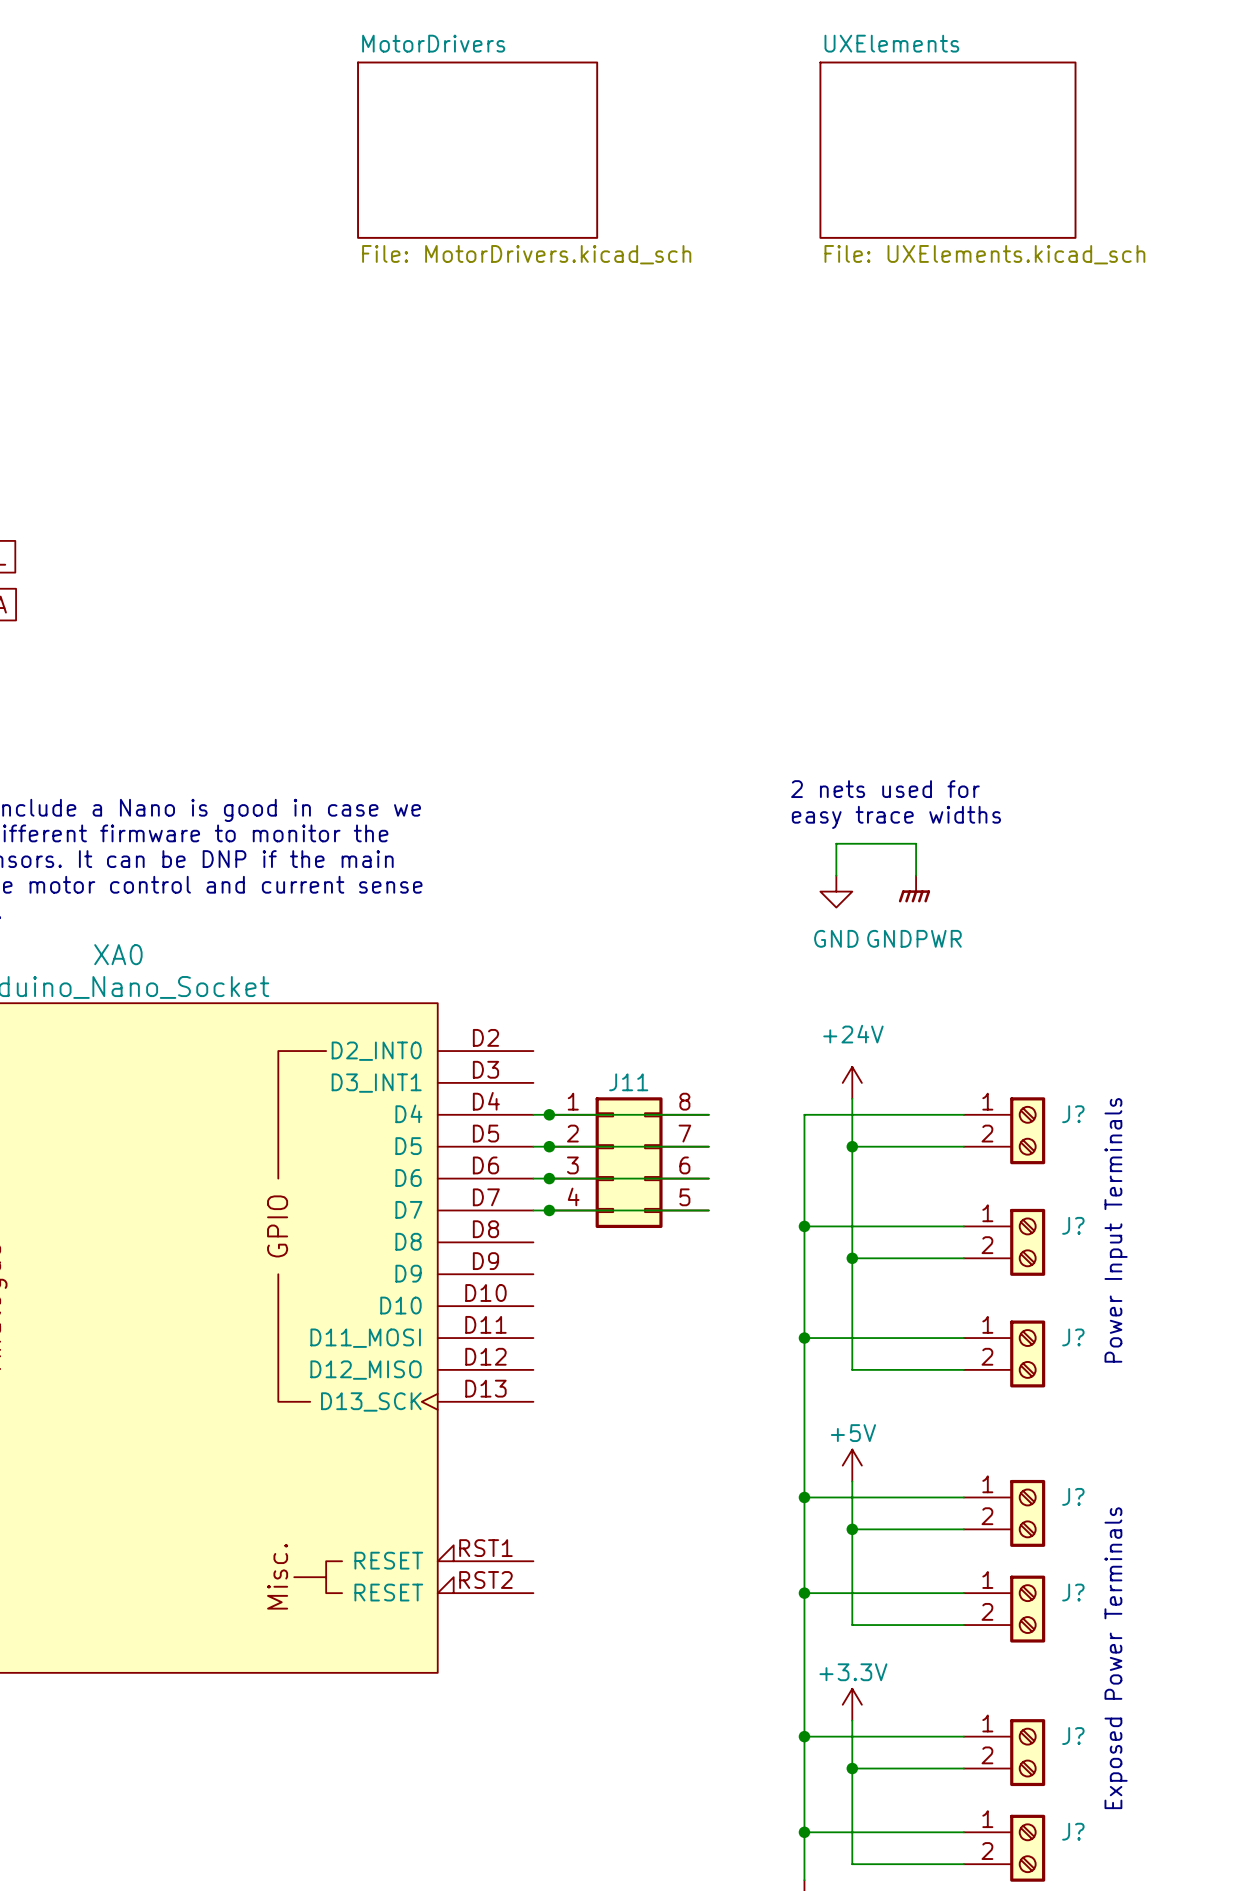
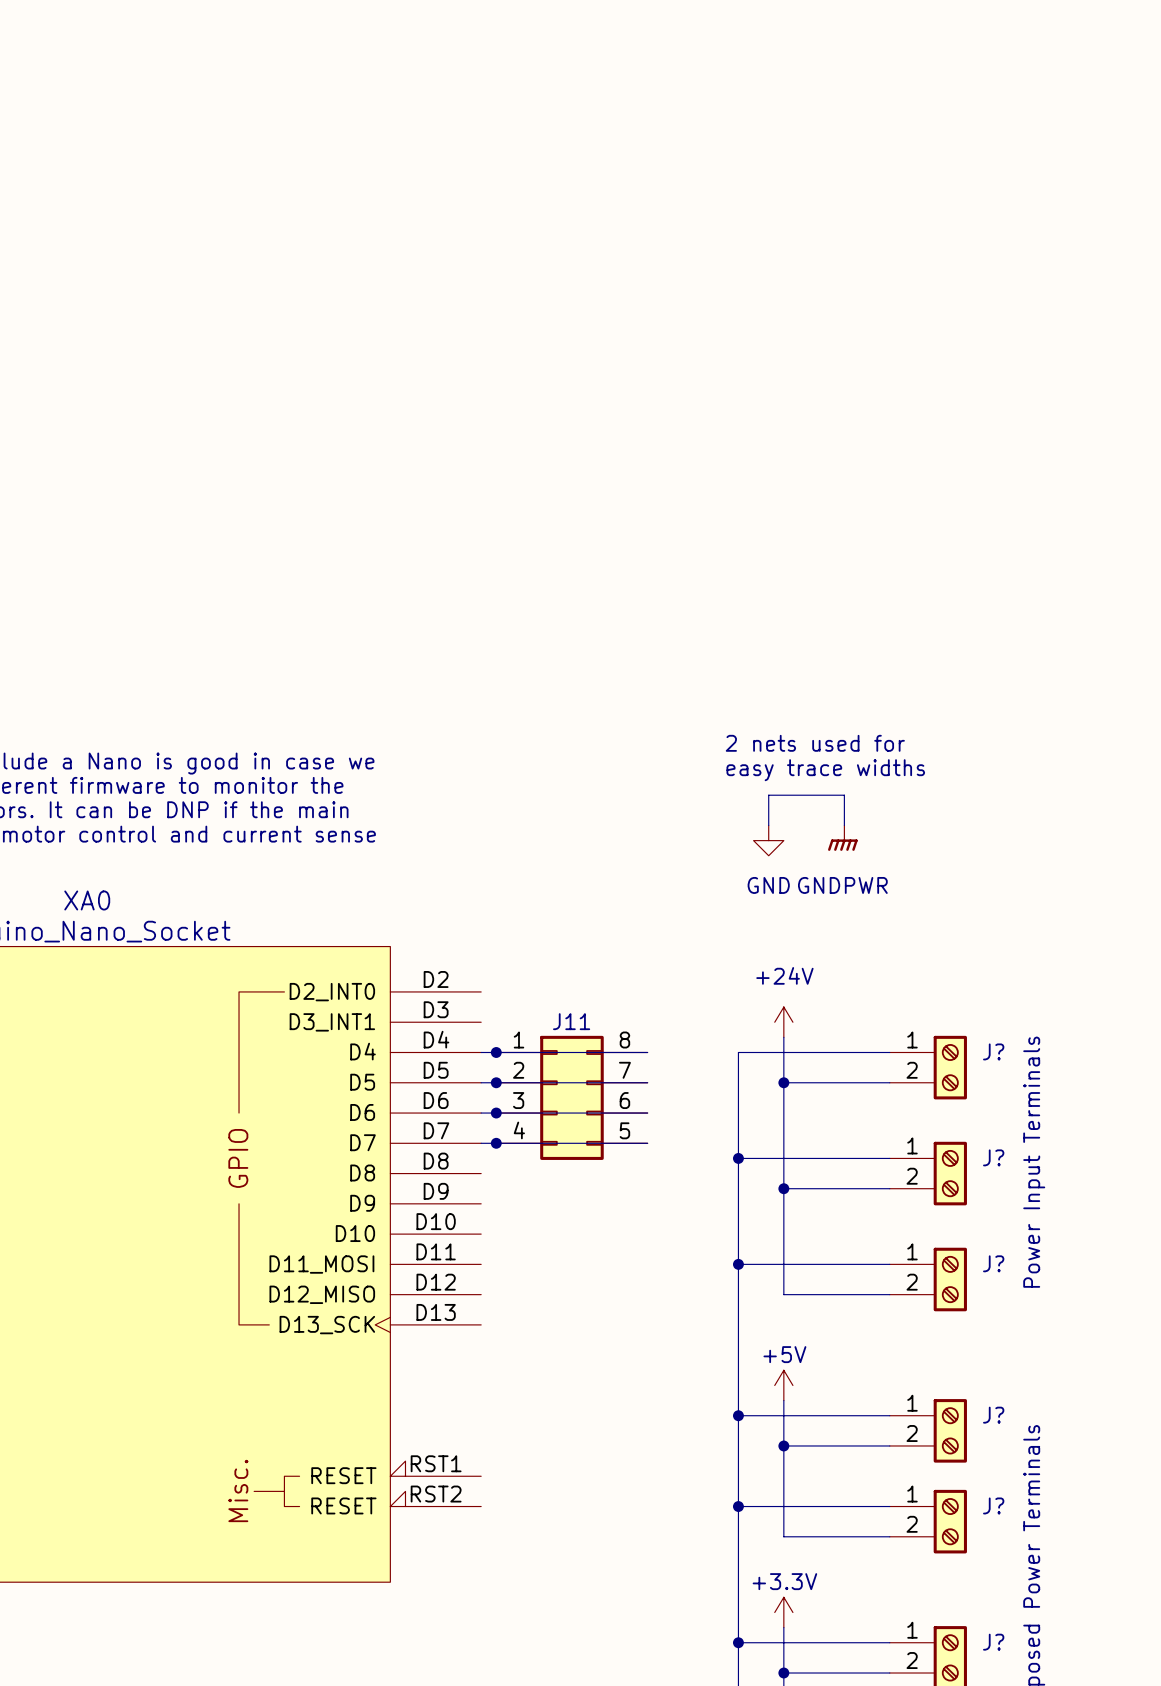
sheet MotorDrivers: File: MotorDrivers.kicad_sch (477, 150) -> none
sheet UXElements: File: UXElements.kicad_sch (947, 150) -> none

